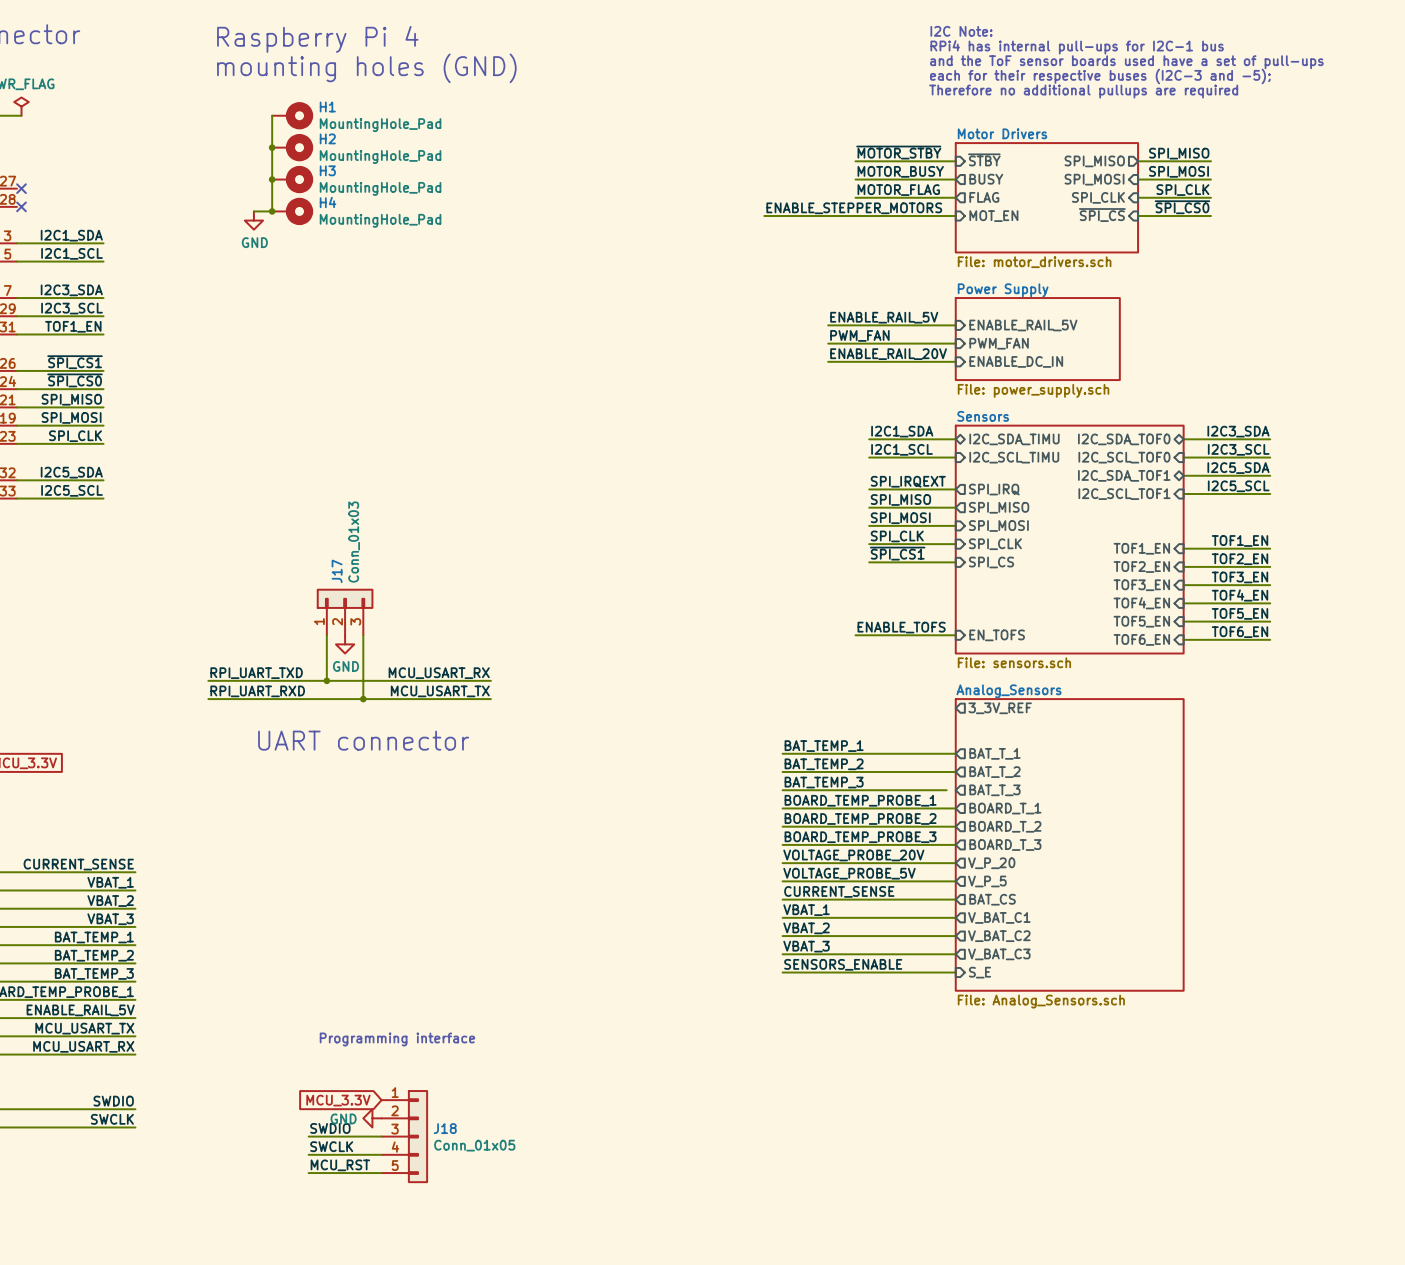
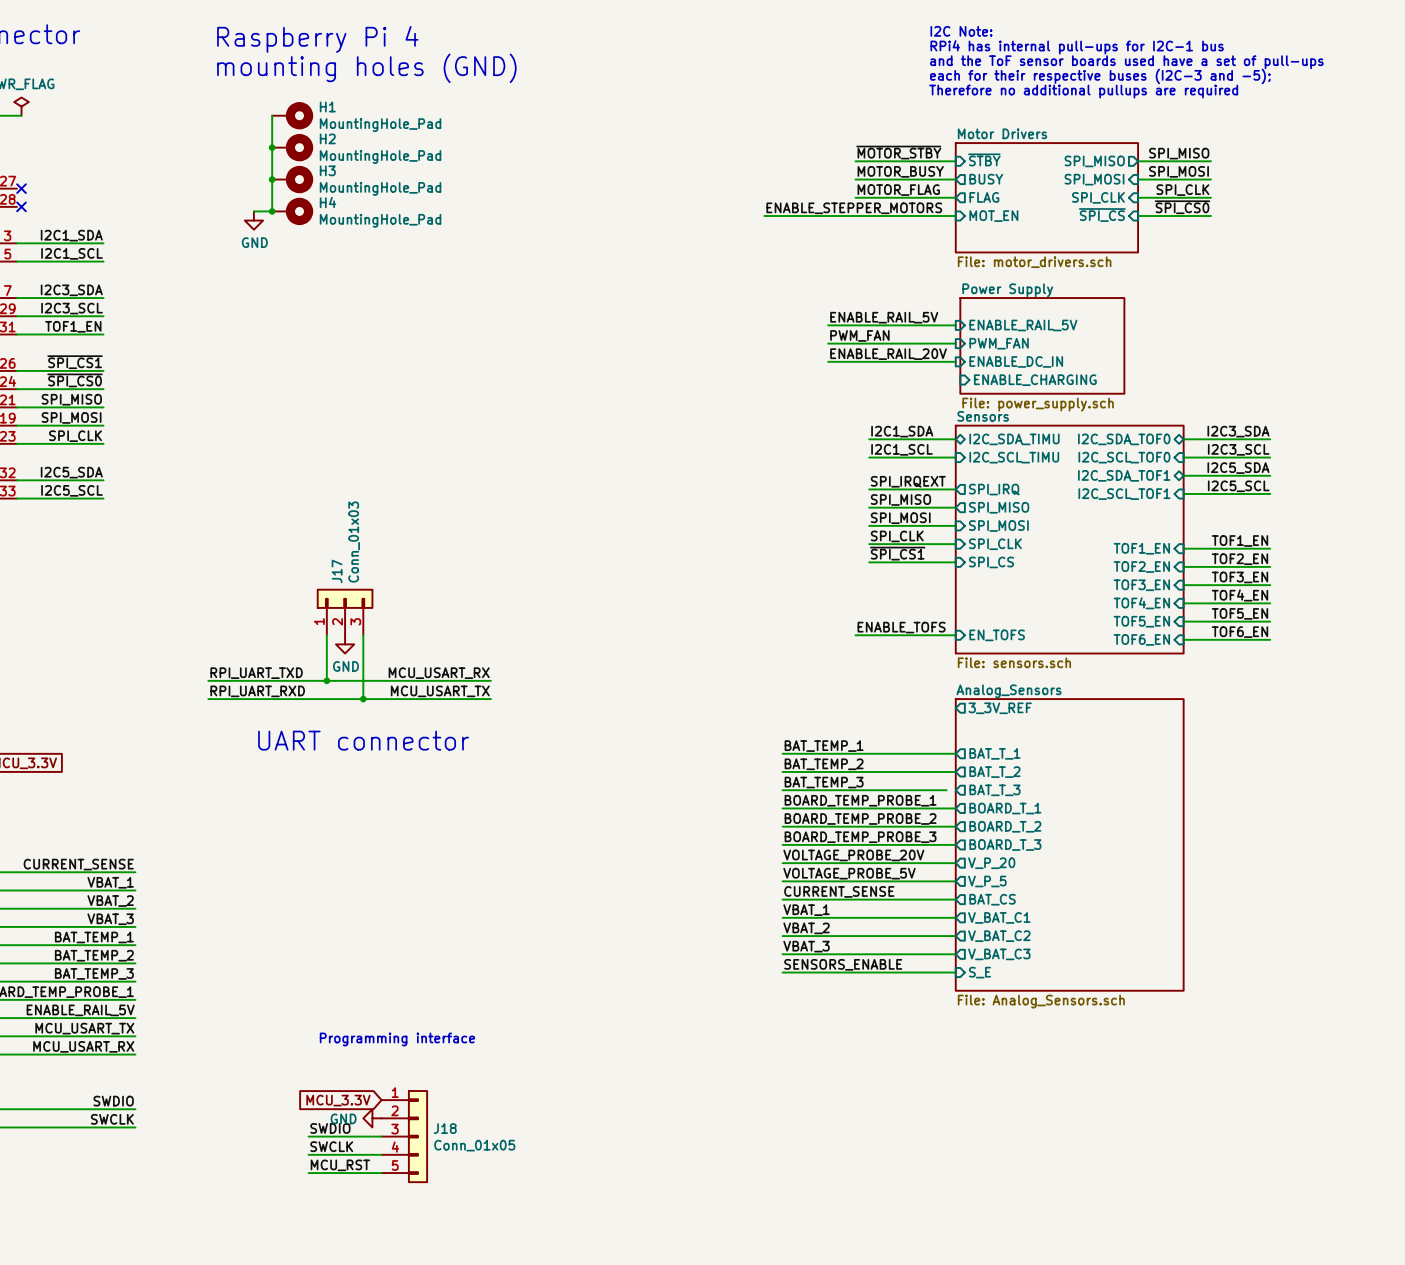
sheet Power Supply: File: power_supply.sch (1037, 339) -> none
sheet Power Supply: none -> File: power_supply.sch (1042, 345)
sheet pin: none -> ENABLE_CHARGING (1035, 380)

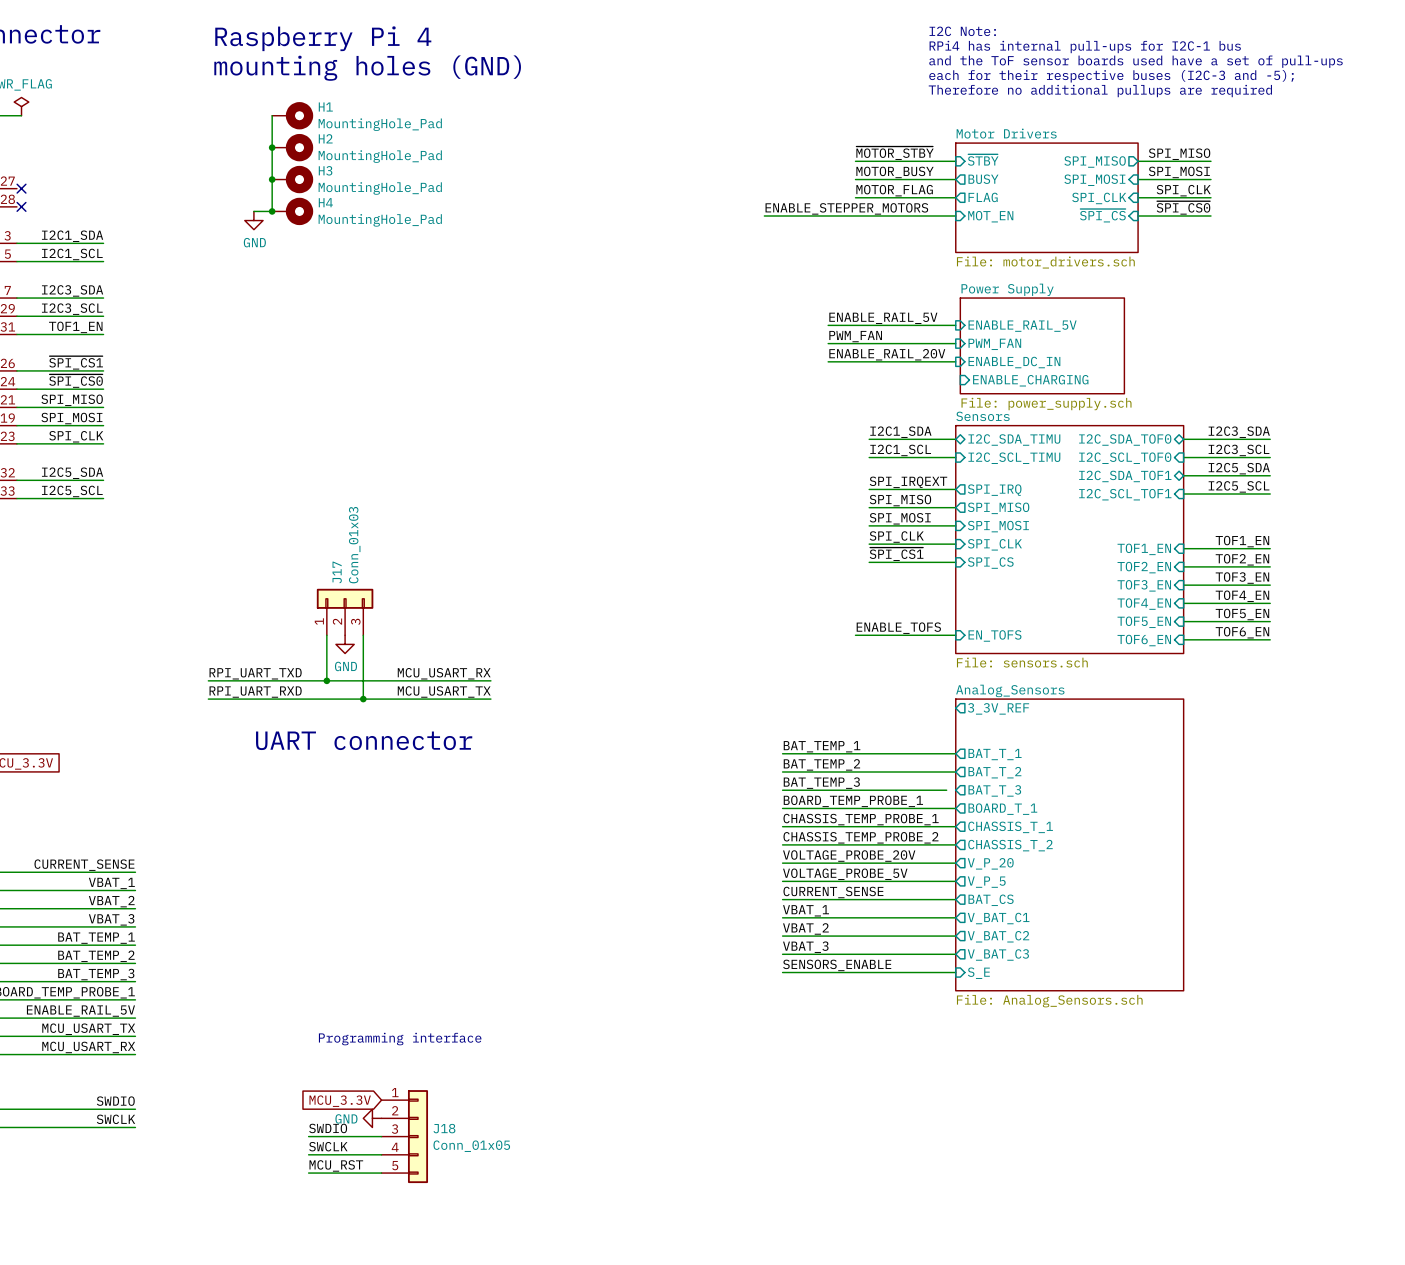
label: BOARD_TEMP_PROBE_2 (860, 818) -> CHASSIS_TEMP_PROBE_1 (861, 819)
sheet pin: BOARD_T_2 (1005, 826) -> CHASSIS_T_1 (1010, 827)
label: BOARD_TEMP_PROBE_3 (860, 837) -> CHASSIS_TEMP_PROBE_2 (860, 837)
sheet pin: BOARD_T_3 (1005, 845) -> CHASSIS_T_2 (1010, 845)

